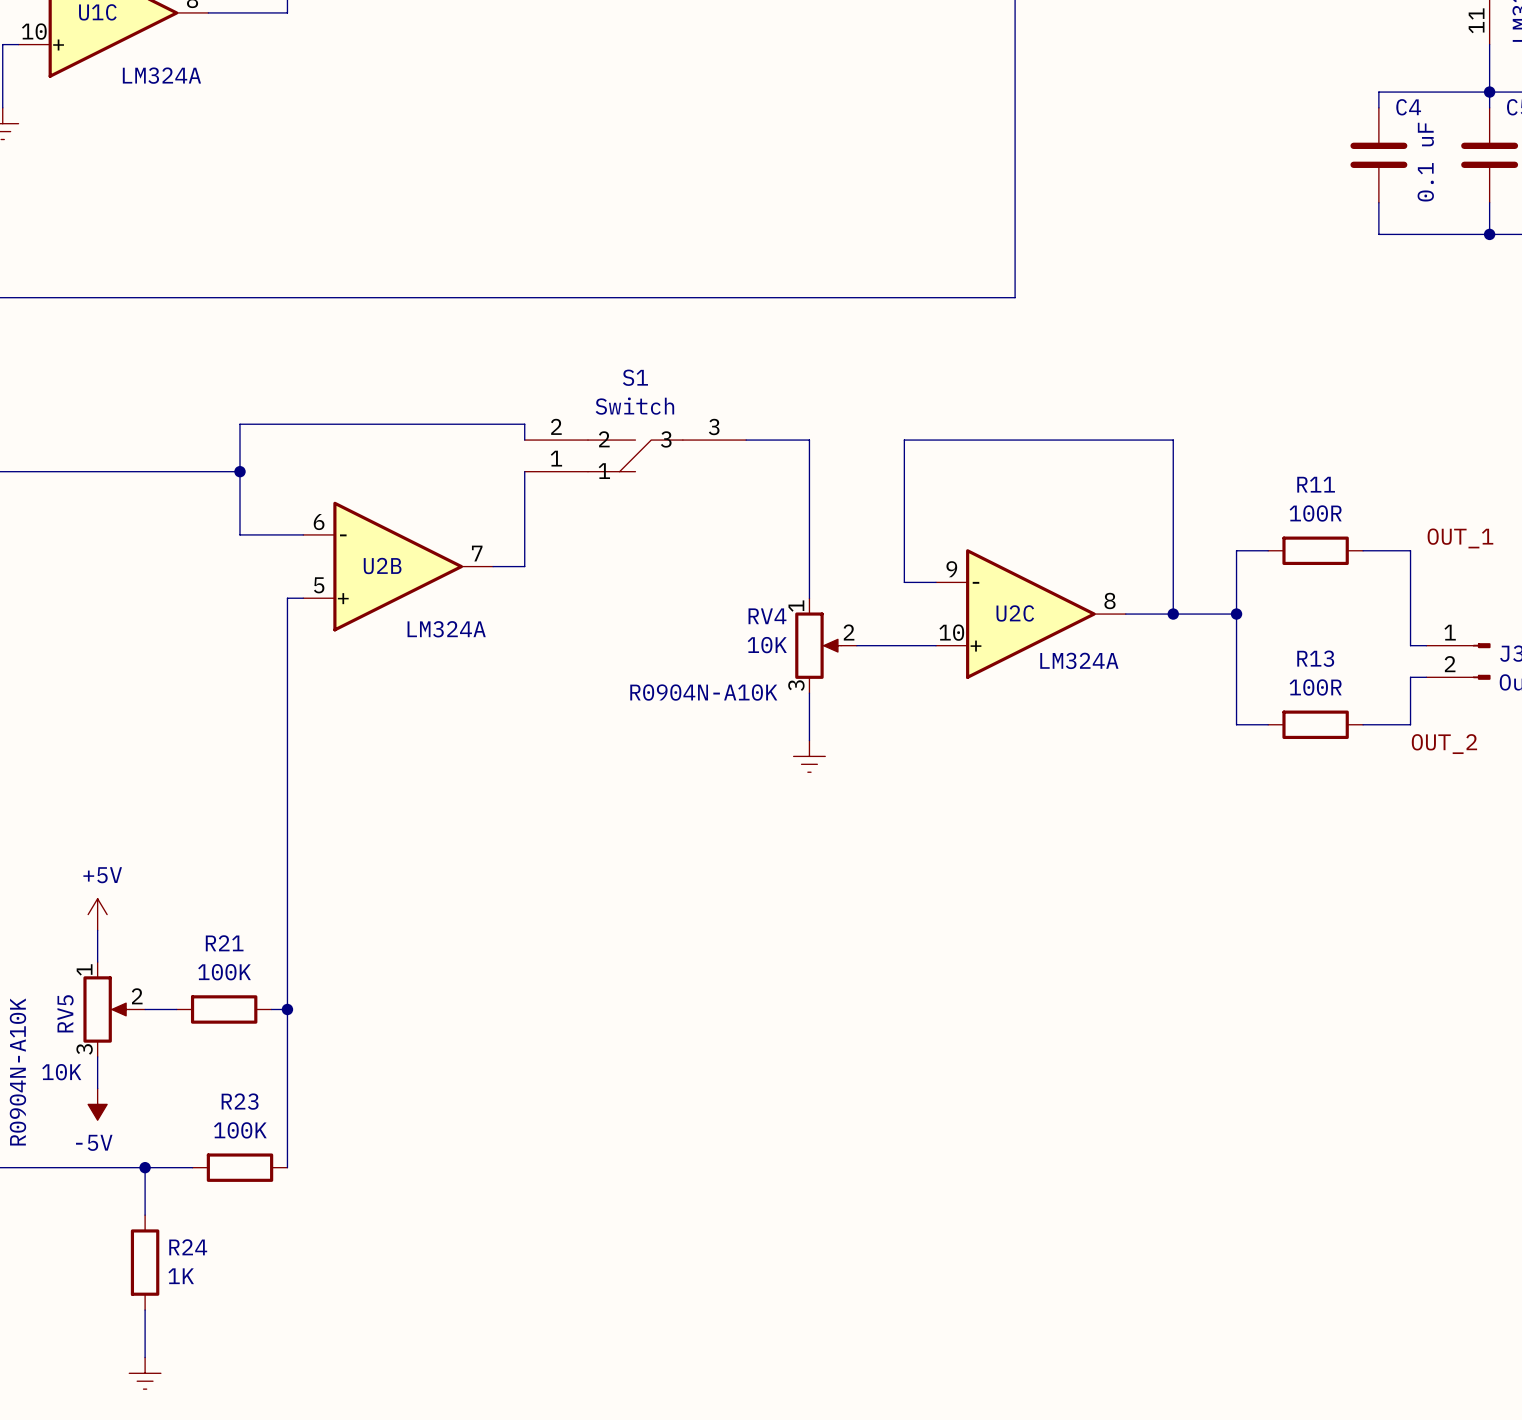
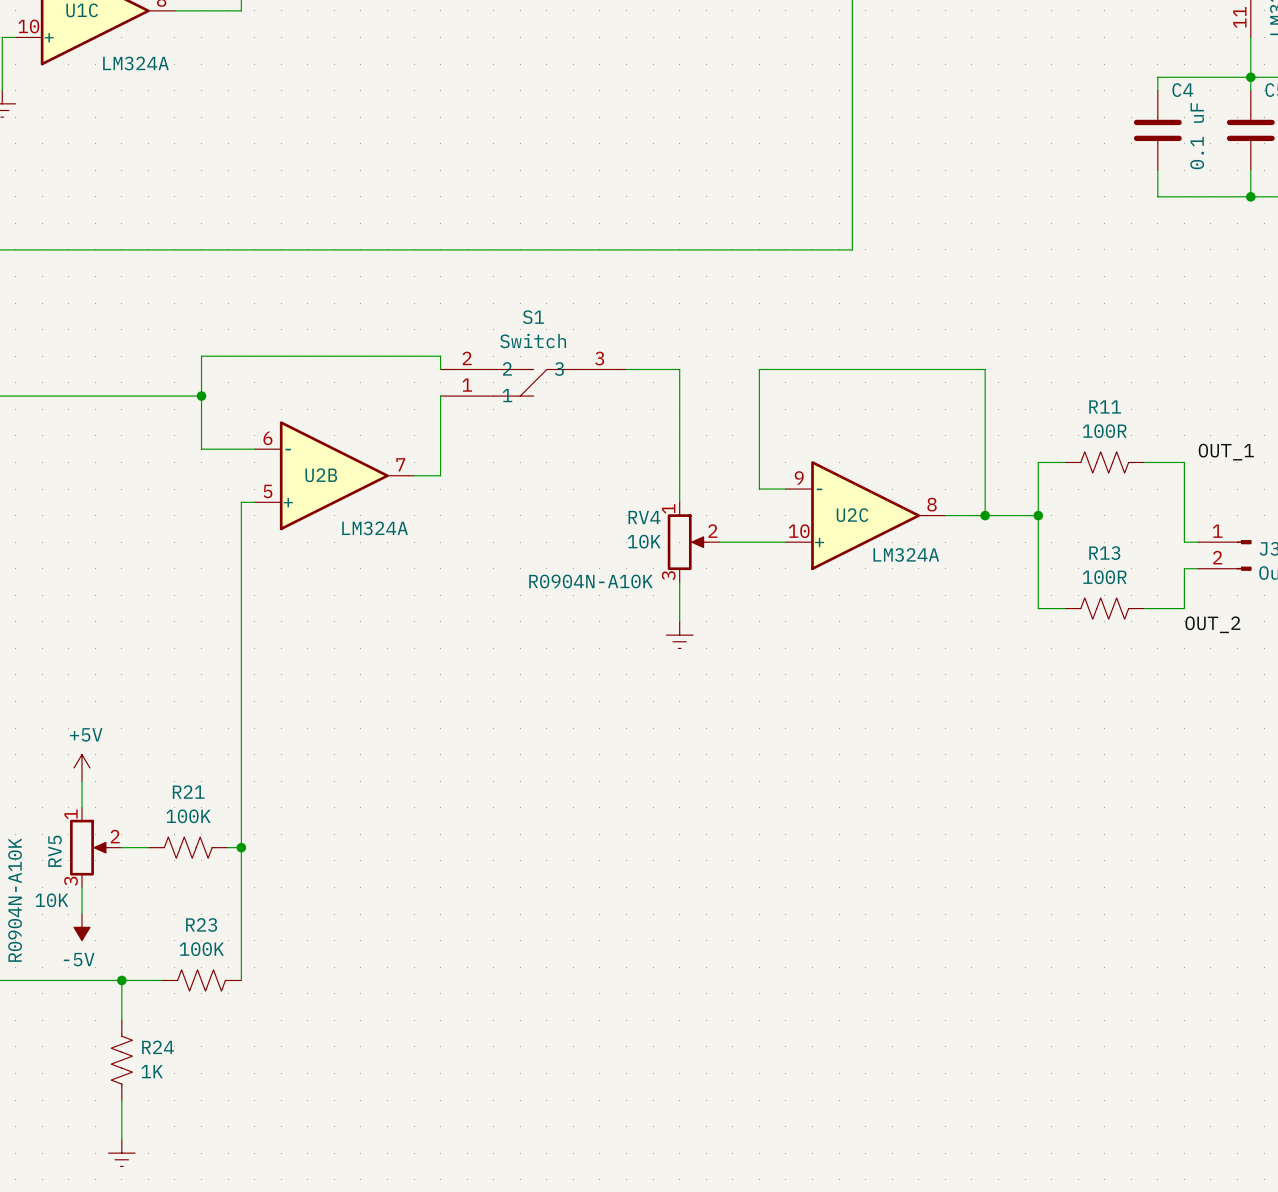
R11 symbol: [1268, 536, 1364, 566] -> [1064, 451, 1145, 474]
R13 symbol: [1268, 710, 1364, 740] -> [1064, 597, 1145, 620]
R21 symbol: [176, 995, 272, 1024] -> [148, 837, 229, 859]
R23 symbol: [192, 1153, 288, 1182] -> [161, 969, 242, 992]
R24 symbol: [130, 1215, 160, 1311] -> [111, 1020, 133, 1101]

